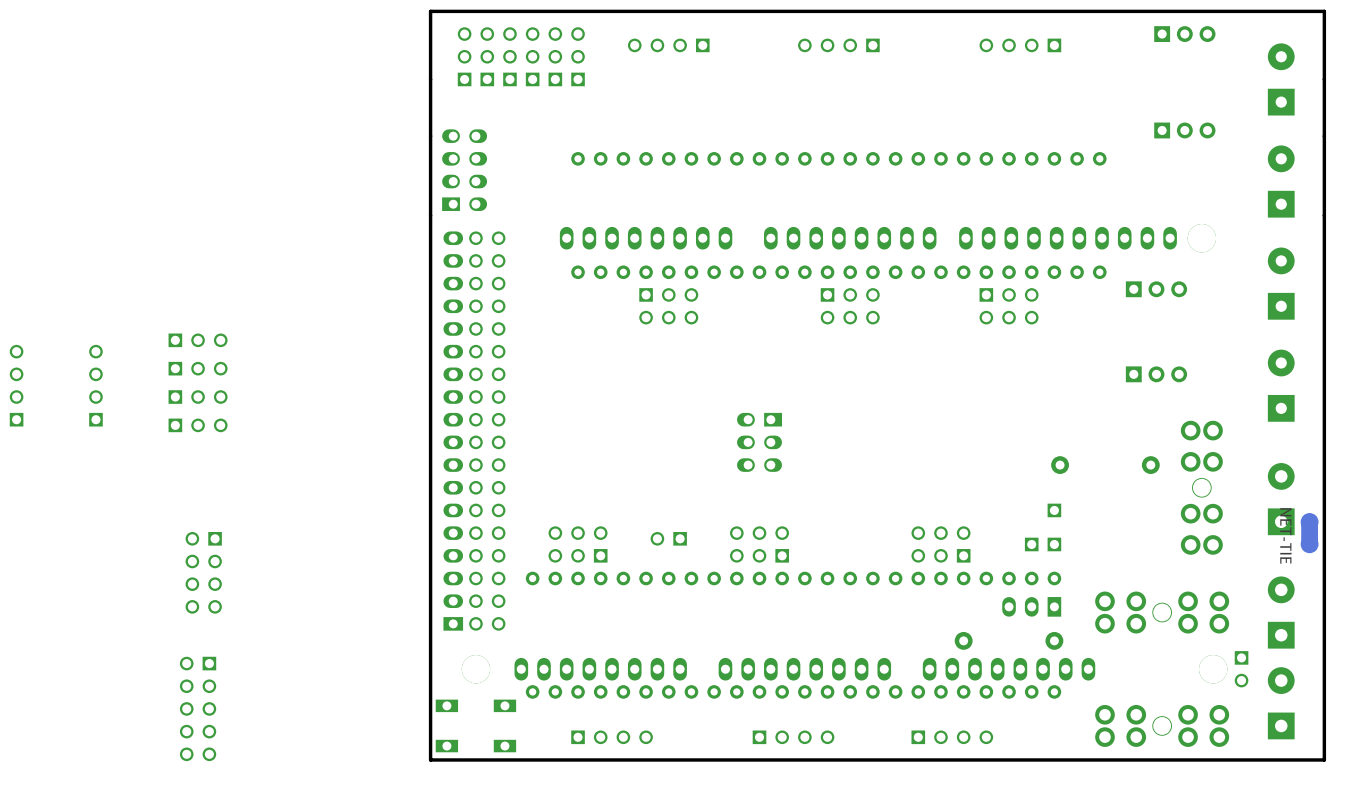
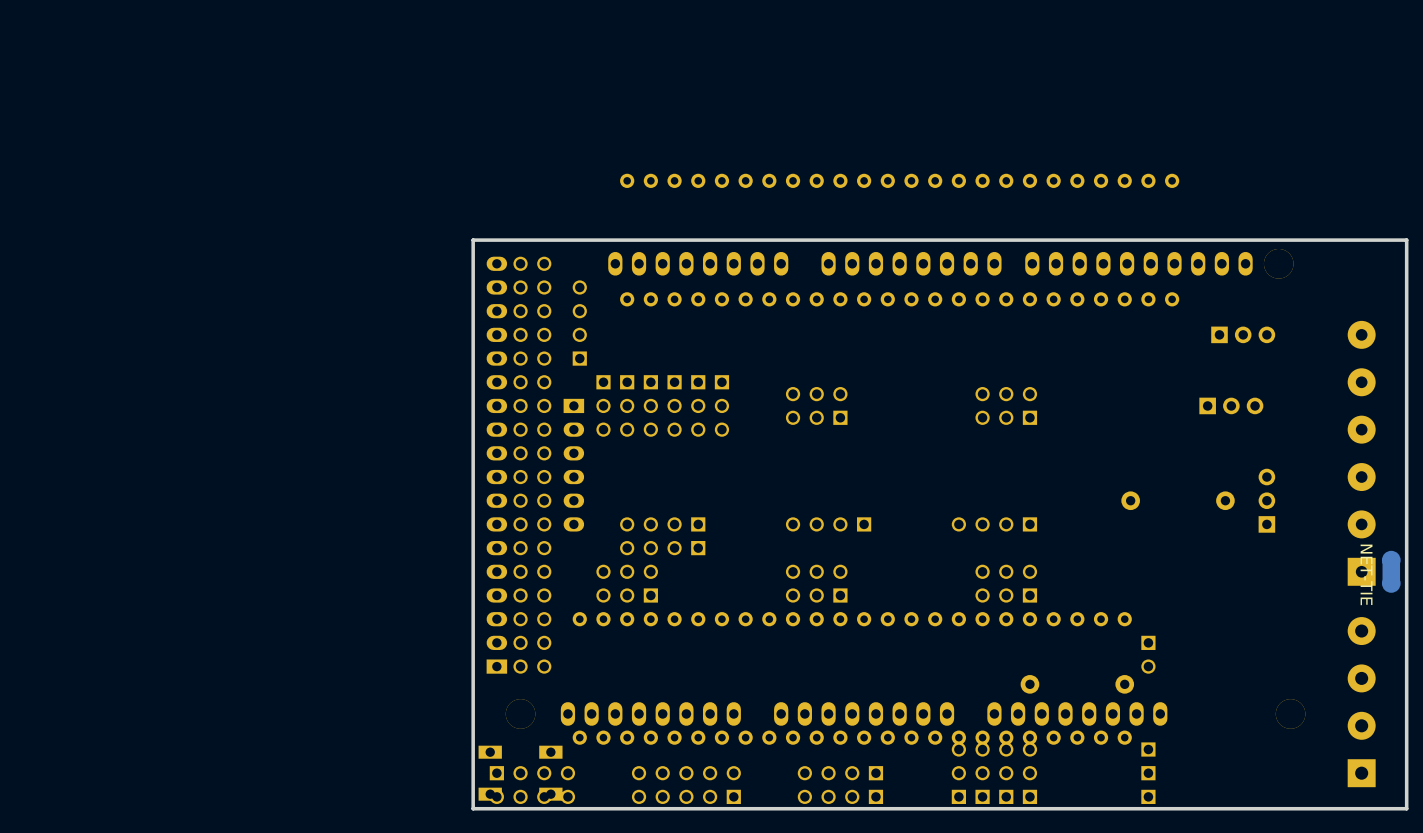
part: (1184, 34) -> none
part: (668, 45) -> none
part: (838, 45) -> none
part: (1020, 45) -> none
part: (464, 56) -> none
part: (487, 56) -> none
part: (509, 56) -> none
part: (532, 56) -> none
part: (555, 56) -> none
part: (578, 56) -> none
part: (1281, 79) -> none
part: (1184, 130) -> none
part: (464, 170) -> none
part: (1281, 181) -> none
board edge: (1324, 215) (1324, 11) (430, 11) (430, 215) -> (1406, 240) (473, 240)
part: (1281, 283) -> none
part position: (1156, 289) -> (1243, 334)
part: none -> (579, 323)
part: (668, 306) -> none
part: (850, 306) -> none
part: (1009, 306) -> none
part: (198, 340) -> none
part: (198, 368) -> none
part: none -> (603, 405)
part: none -> (627, 405)
part: none -> (650, 405)
part: none -> (674, 405)
part: none -> (698, 405)
part: none -> (721, 405)
part: none -> (816, 405)
part: none -> (1006, 405)
part: (16, 385) -> none
part: (95, 385) -> none
part: (1281, 385) -> none
part: (198, 397) -> none
part: none -> (1361, 453)
part: (198, 425) -> none
part: none -> (573, 465)
part: (759, 442) -> none
part: none -> (1266, 500)
part: none -> (662, 524)
part: none -> (828, 524)
part: none -> (994, 524)
part: (1201, 487) -> none
part: (1281, 499) -> none
part: none -> (662, 548)
part: (1054, 510) -> none
part: (668, 538) -> none
part: (1031, 544) -> none
part: (1054, 544) -> none
part: (203, 572) -> none
part: (1031, 606) -> none
part: (1162, 612) -> none
part: (1281, 612) -> none
part: none -> (1361, 702)
part position: (1241, 669) -> (1148, 654)
part: none -> (1148, 749)
part: (198, 708) -> none
part: none -> (840, 773)
part: none -> (958, 773)
part: none -> (982, 773)
part: none -> (1006, 773)
part: none -> (1029, 773)
part: none -> (1148, 773)
part: (1162, 725) -> none
part: none -> (532, 785)
part: (612, 737) -> none
part: none -> (686, 785)
part: (793, 737) -> none
part: (952, 737) -> none
part: none -> (840, 796)
part: none -> (1148, 796)

